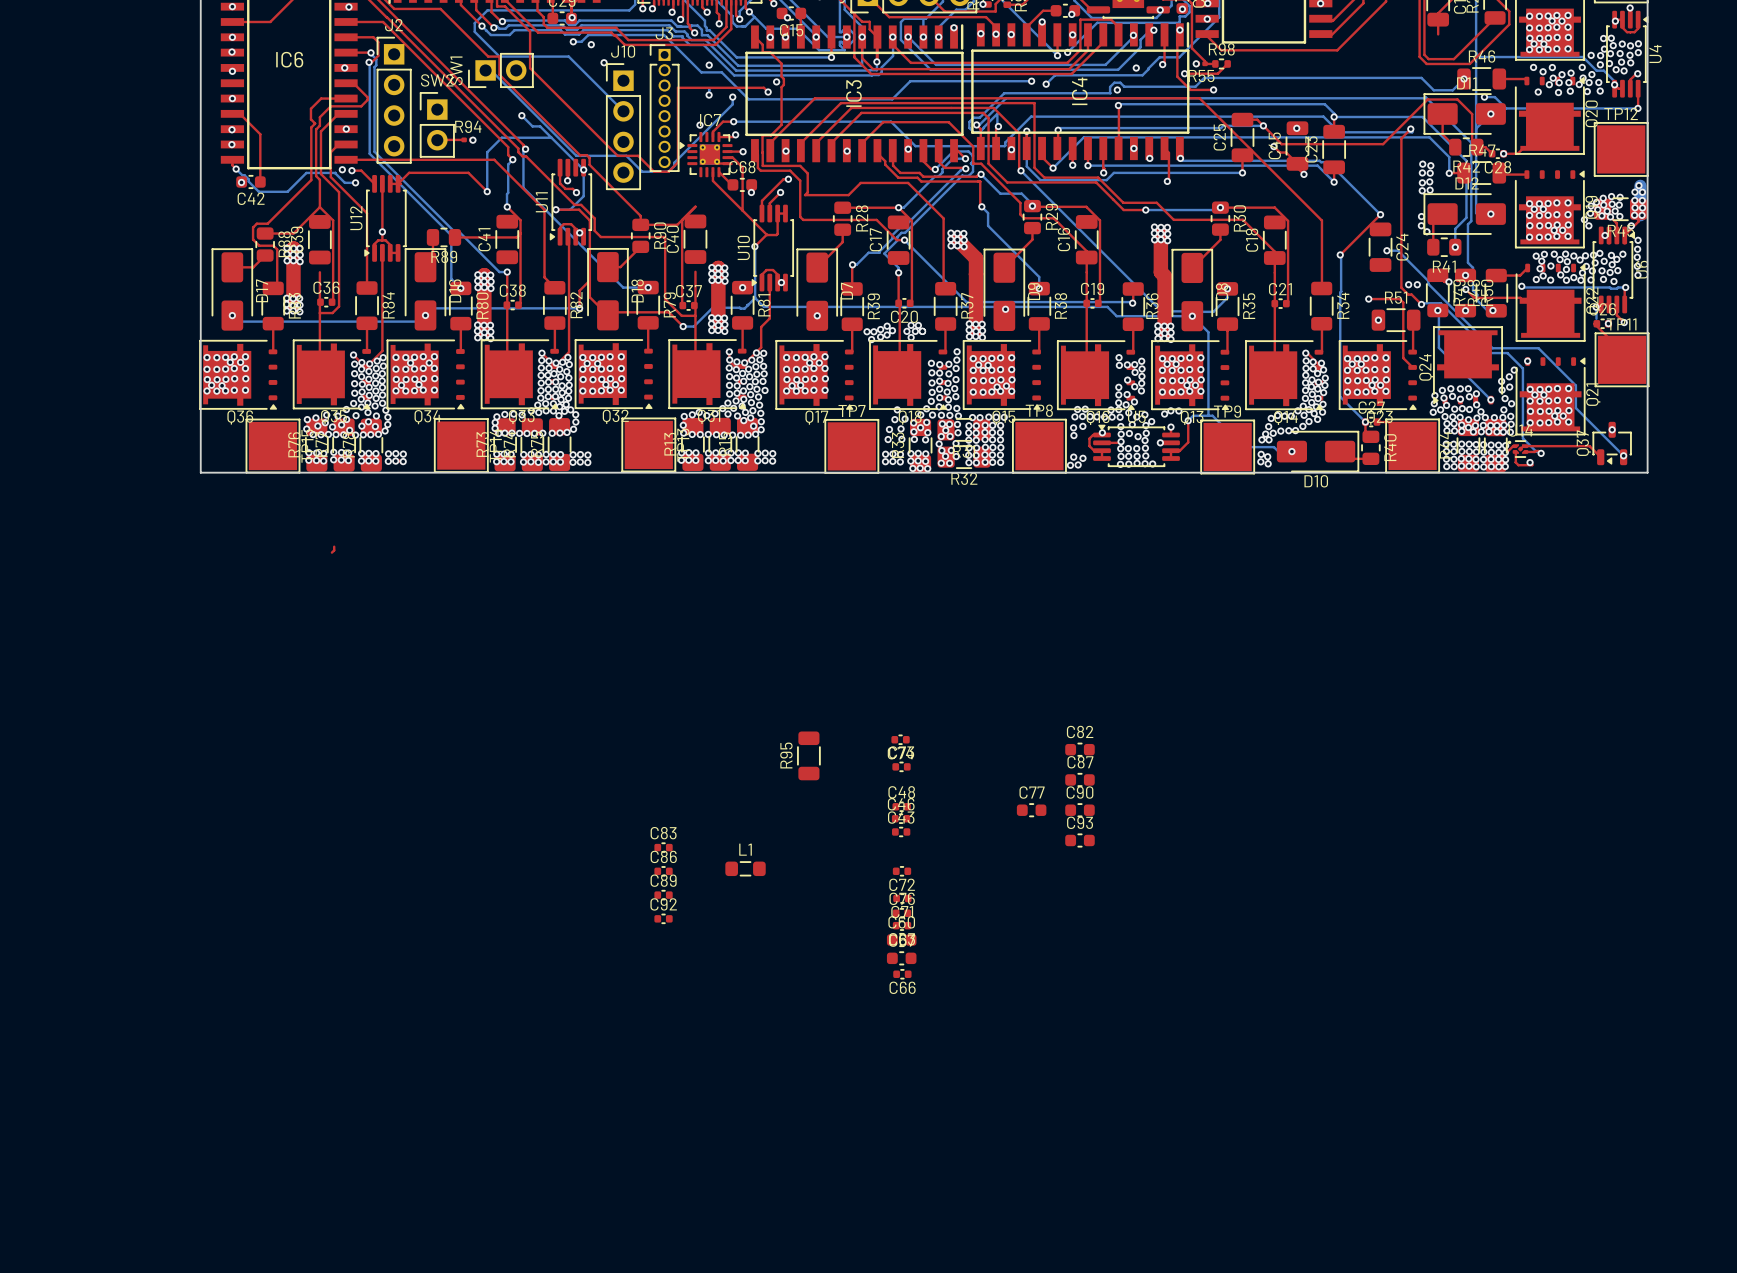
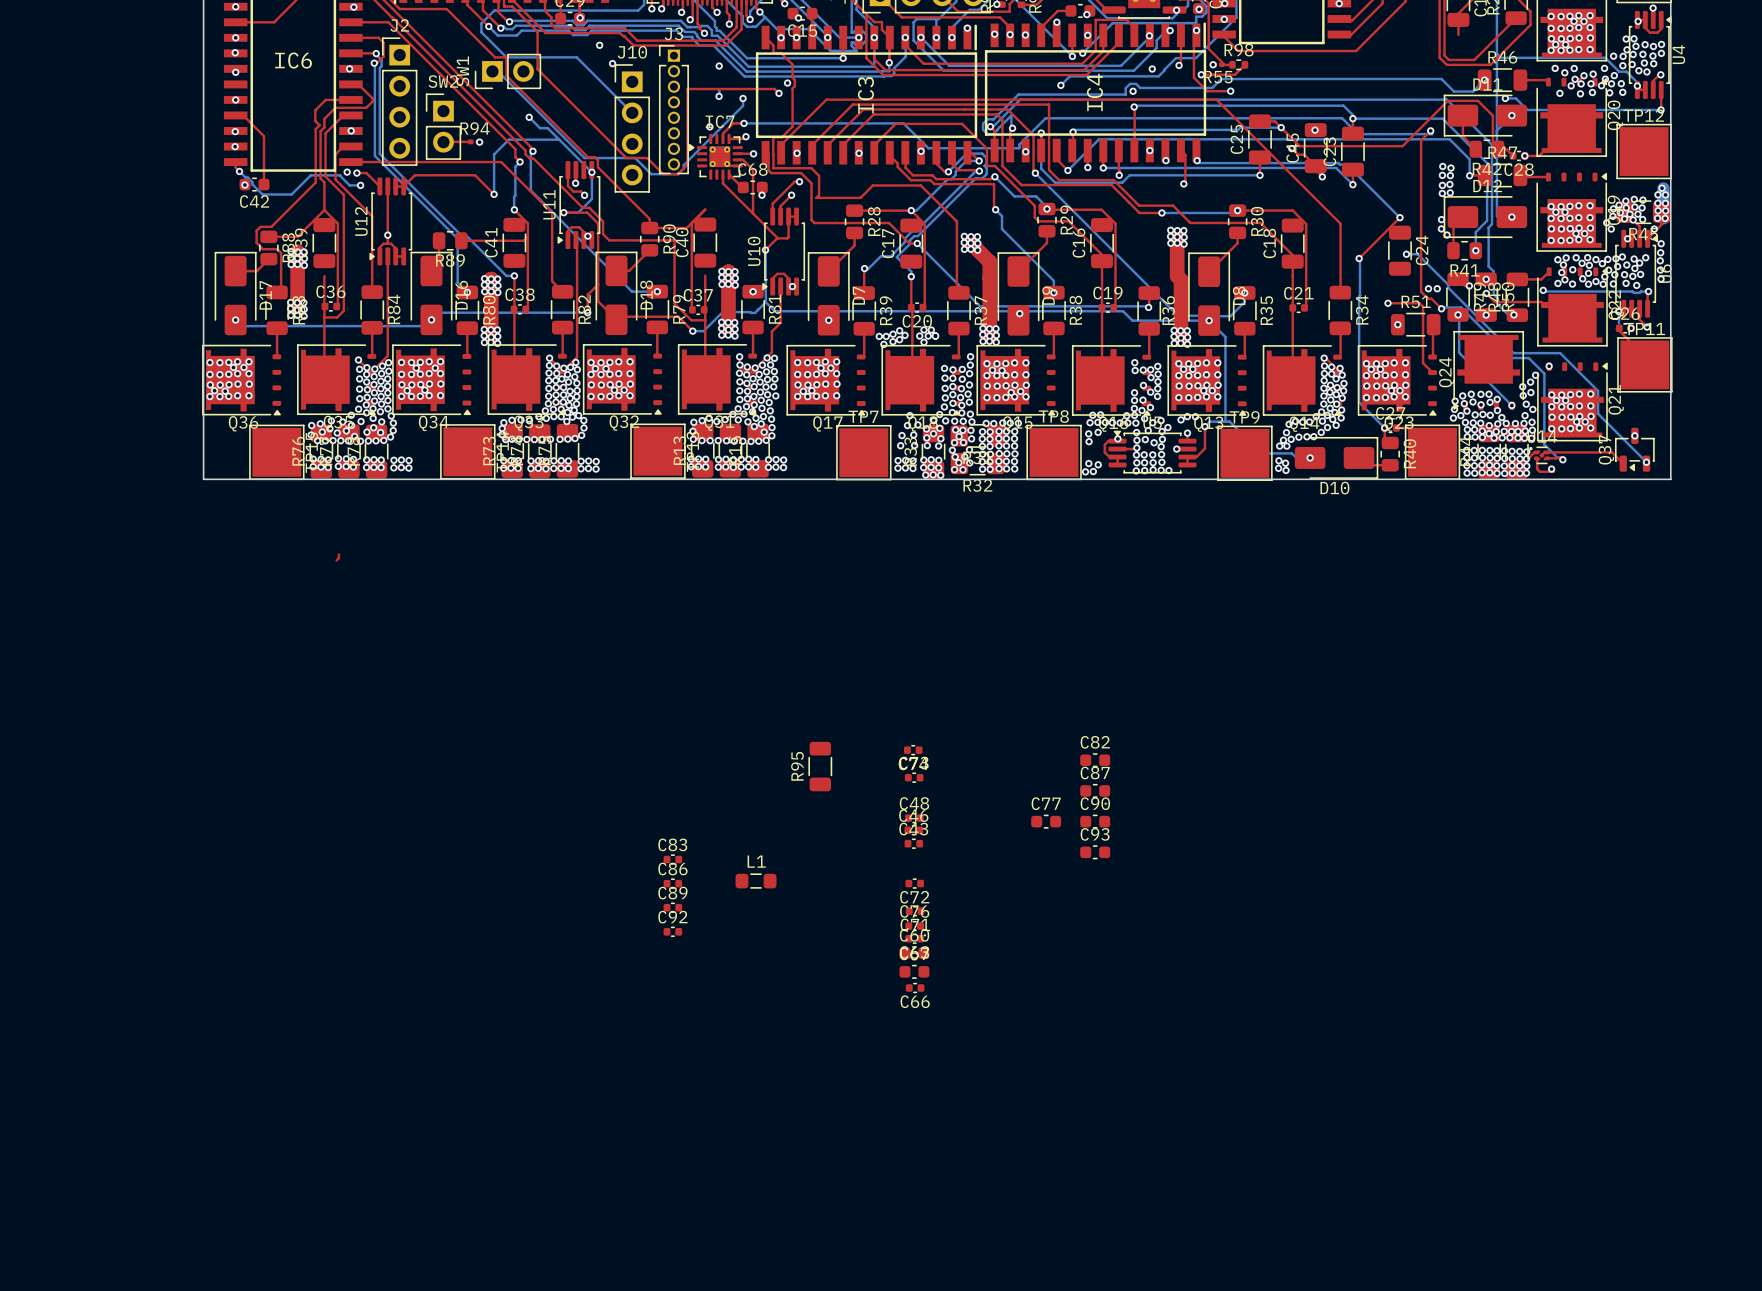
bottom track: (573, 41) (581, 41) (588, 35) (664, 35) (701, 72) (721, 72) (748, 99) (892, 99) (910, 81) (1031, 81) -> none
via: (573, 41) -> none
via: (1031, 81) -> none

